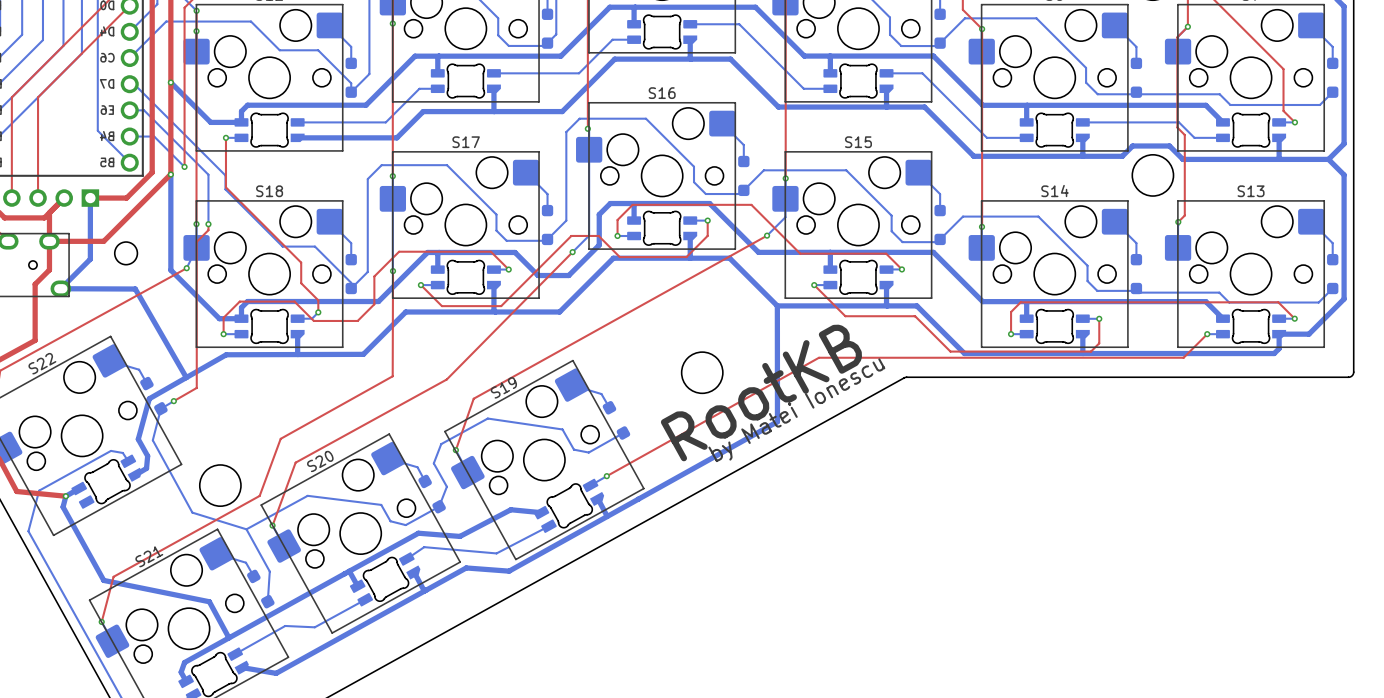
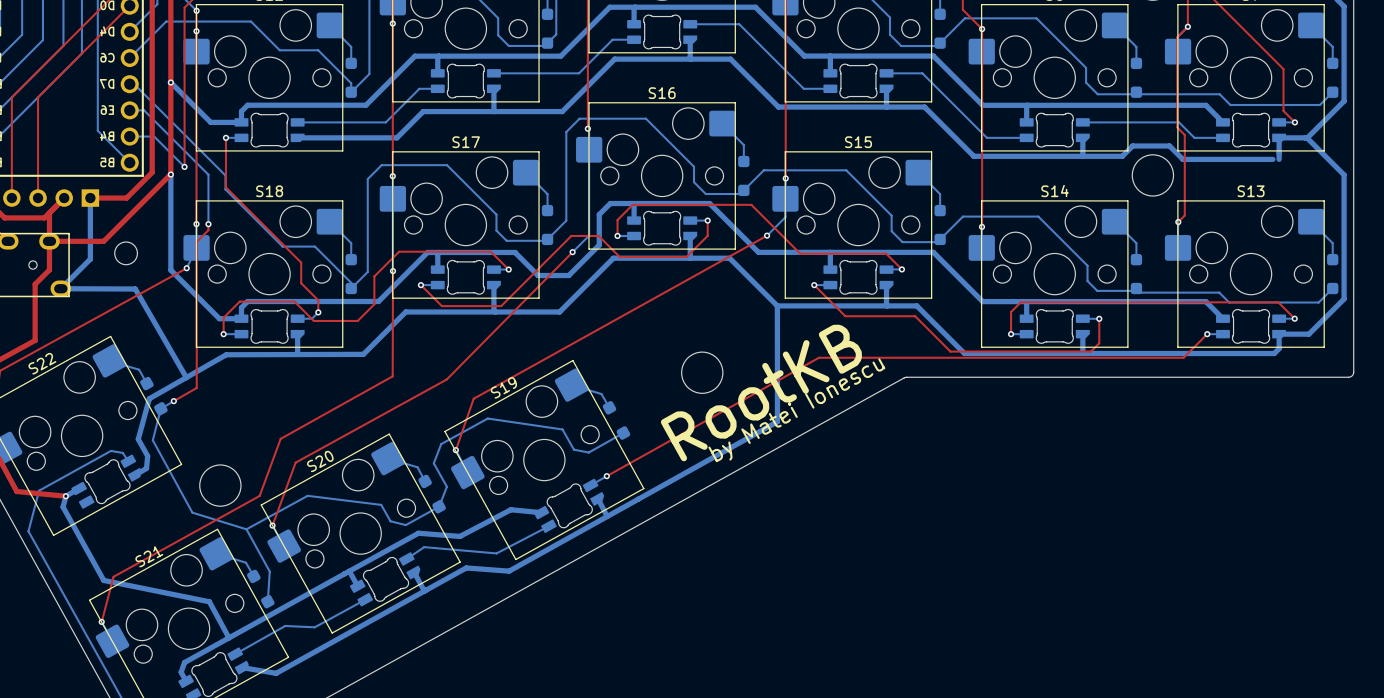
bottom track: (1344, 101) (1344, 143) (1328, 159) (1272, 159) -> (1344, 101) (1307, 137) (1279, 137)
bottom track: none -> (1307, 137) (1328, 159)

